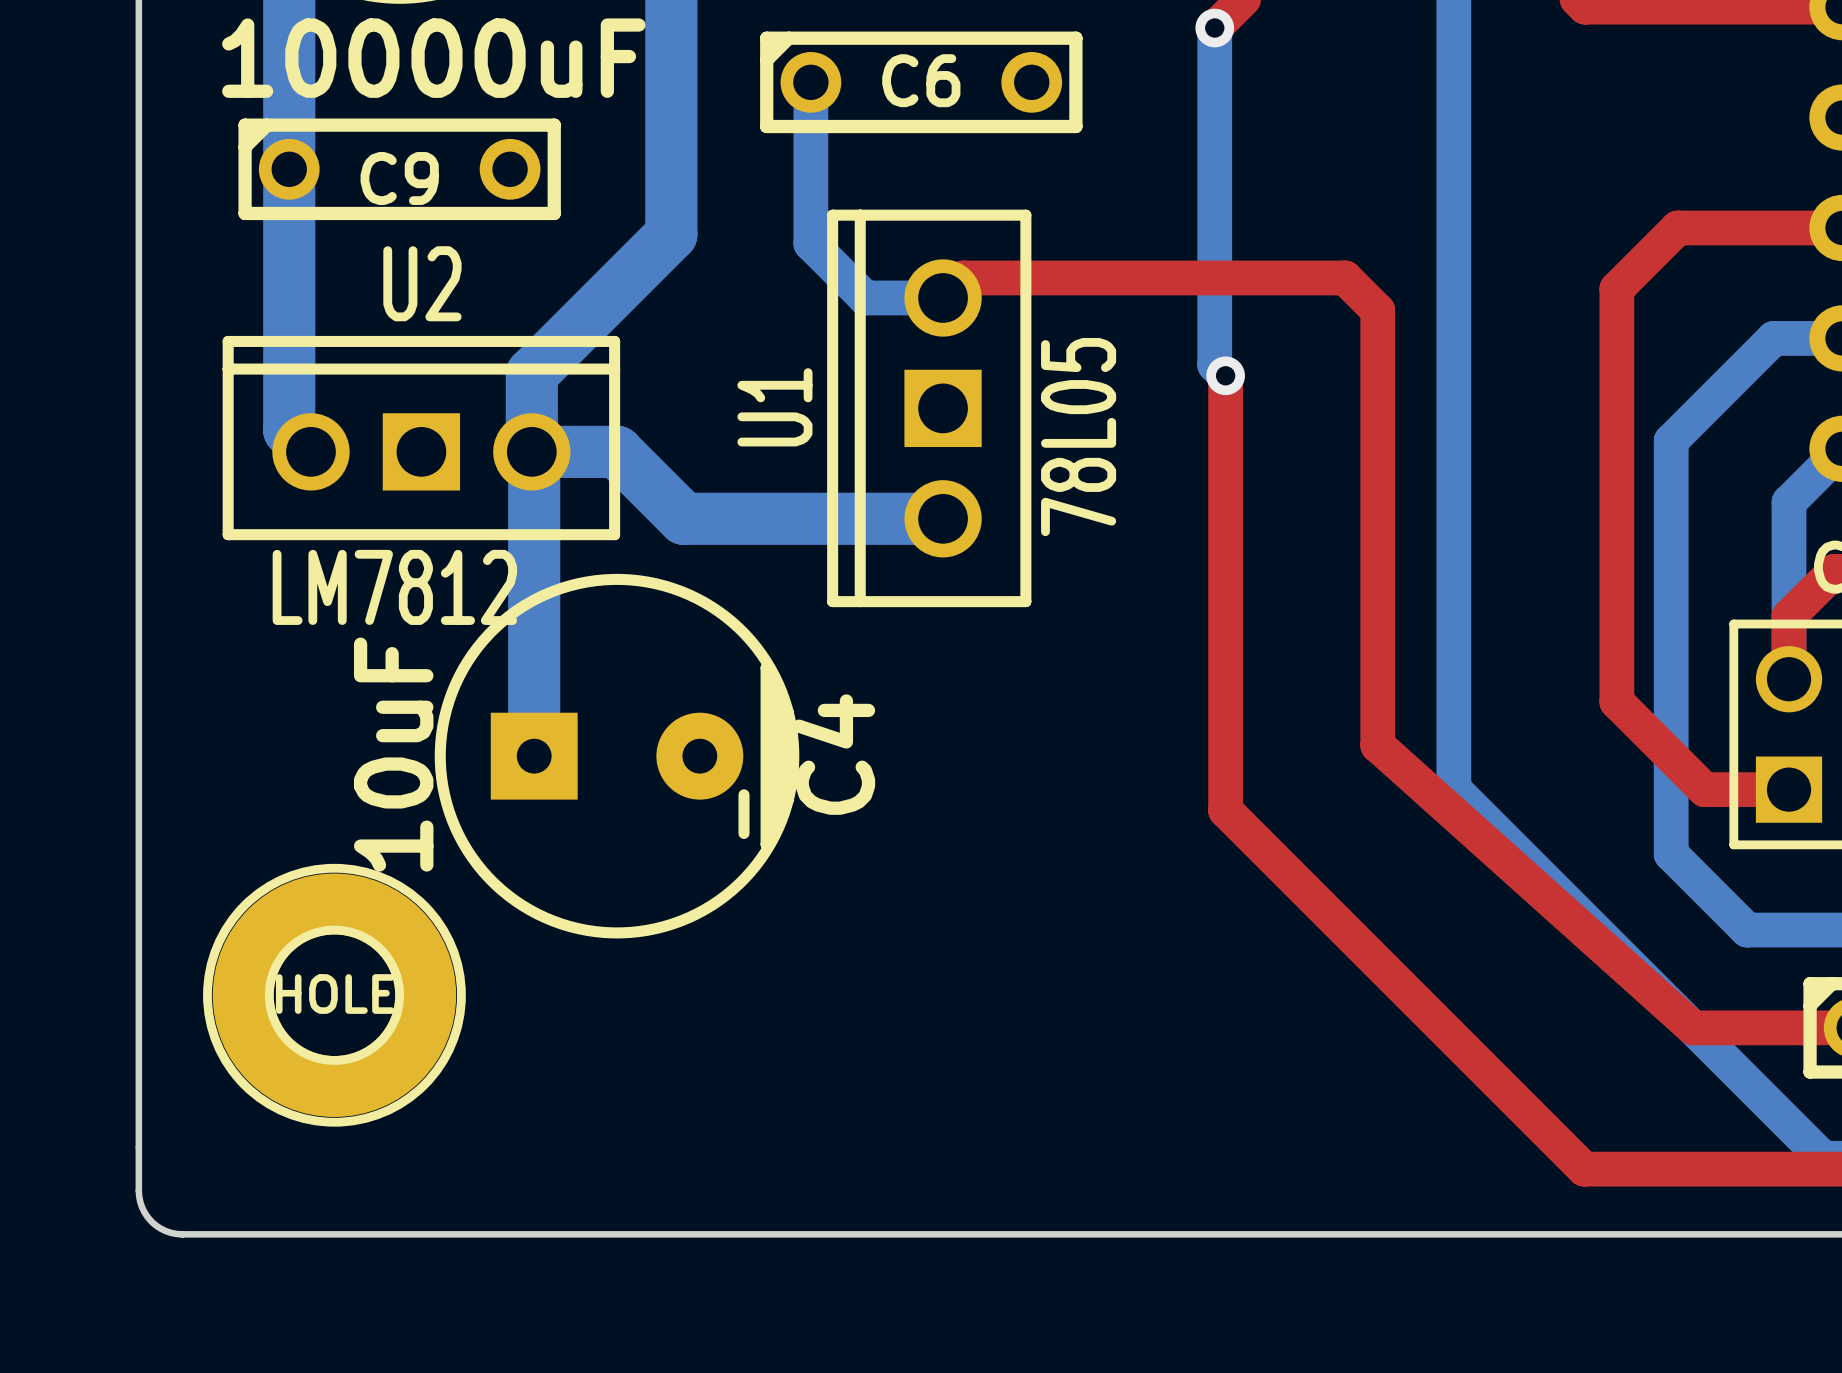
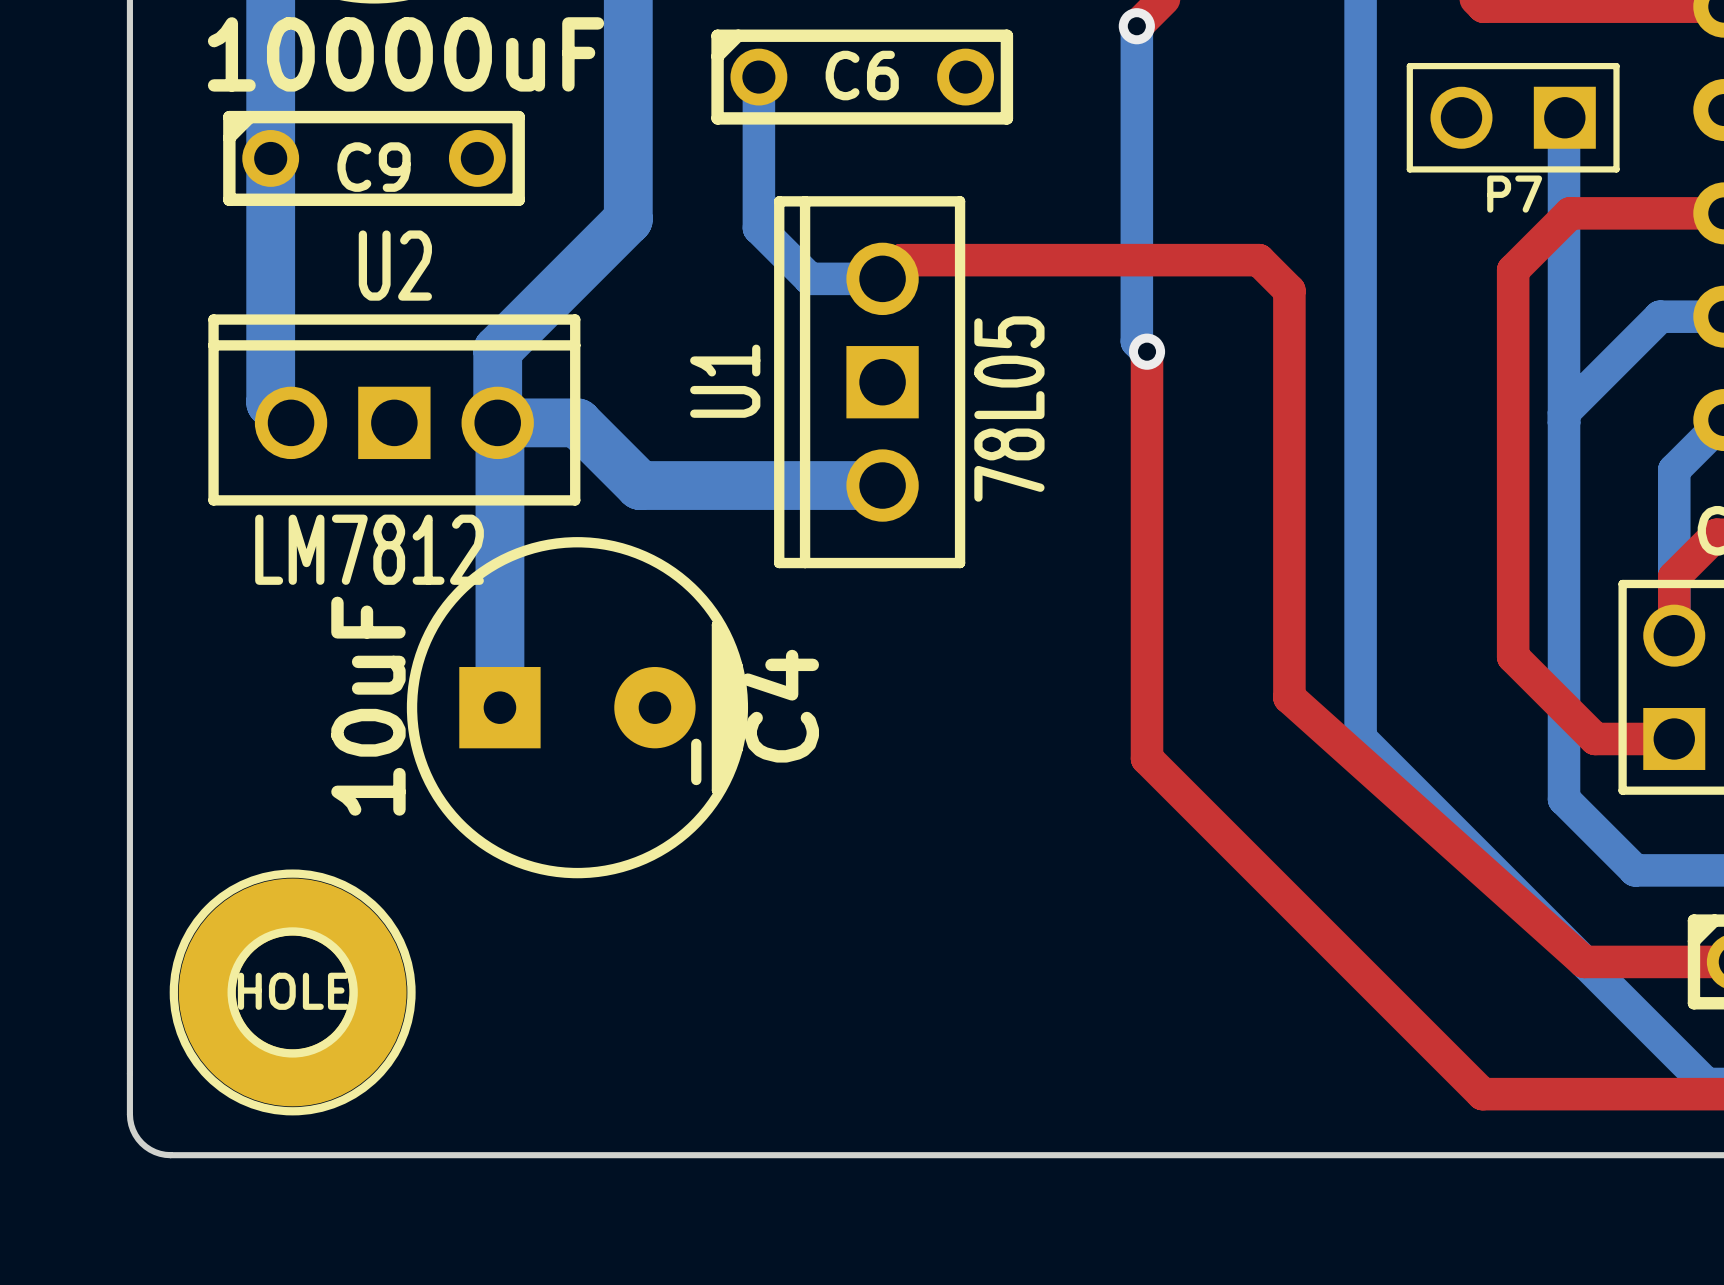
P7: none -> (1513, 117)
bottom track: none -> (1564, 117) (1564, 412)
HOLE position: (334, 995) -> (292, 992)

